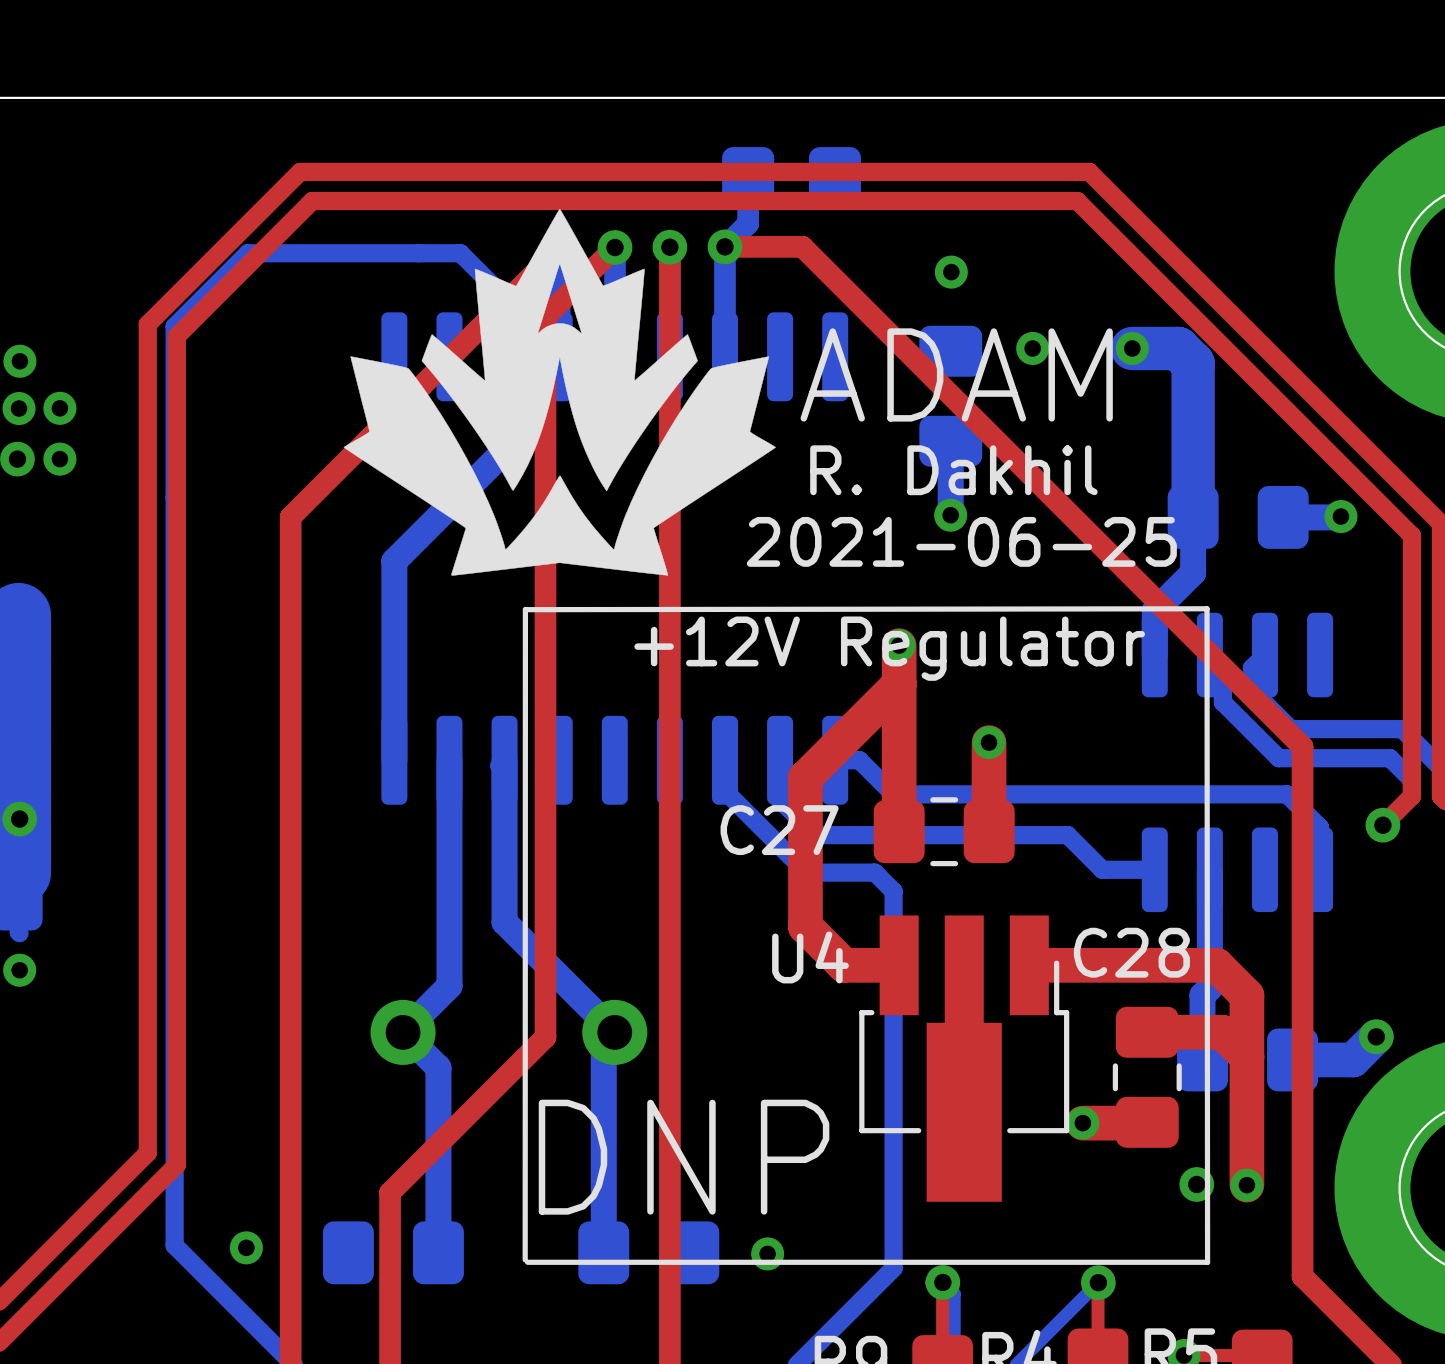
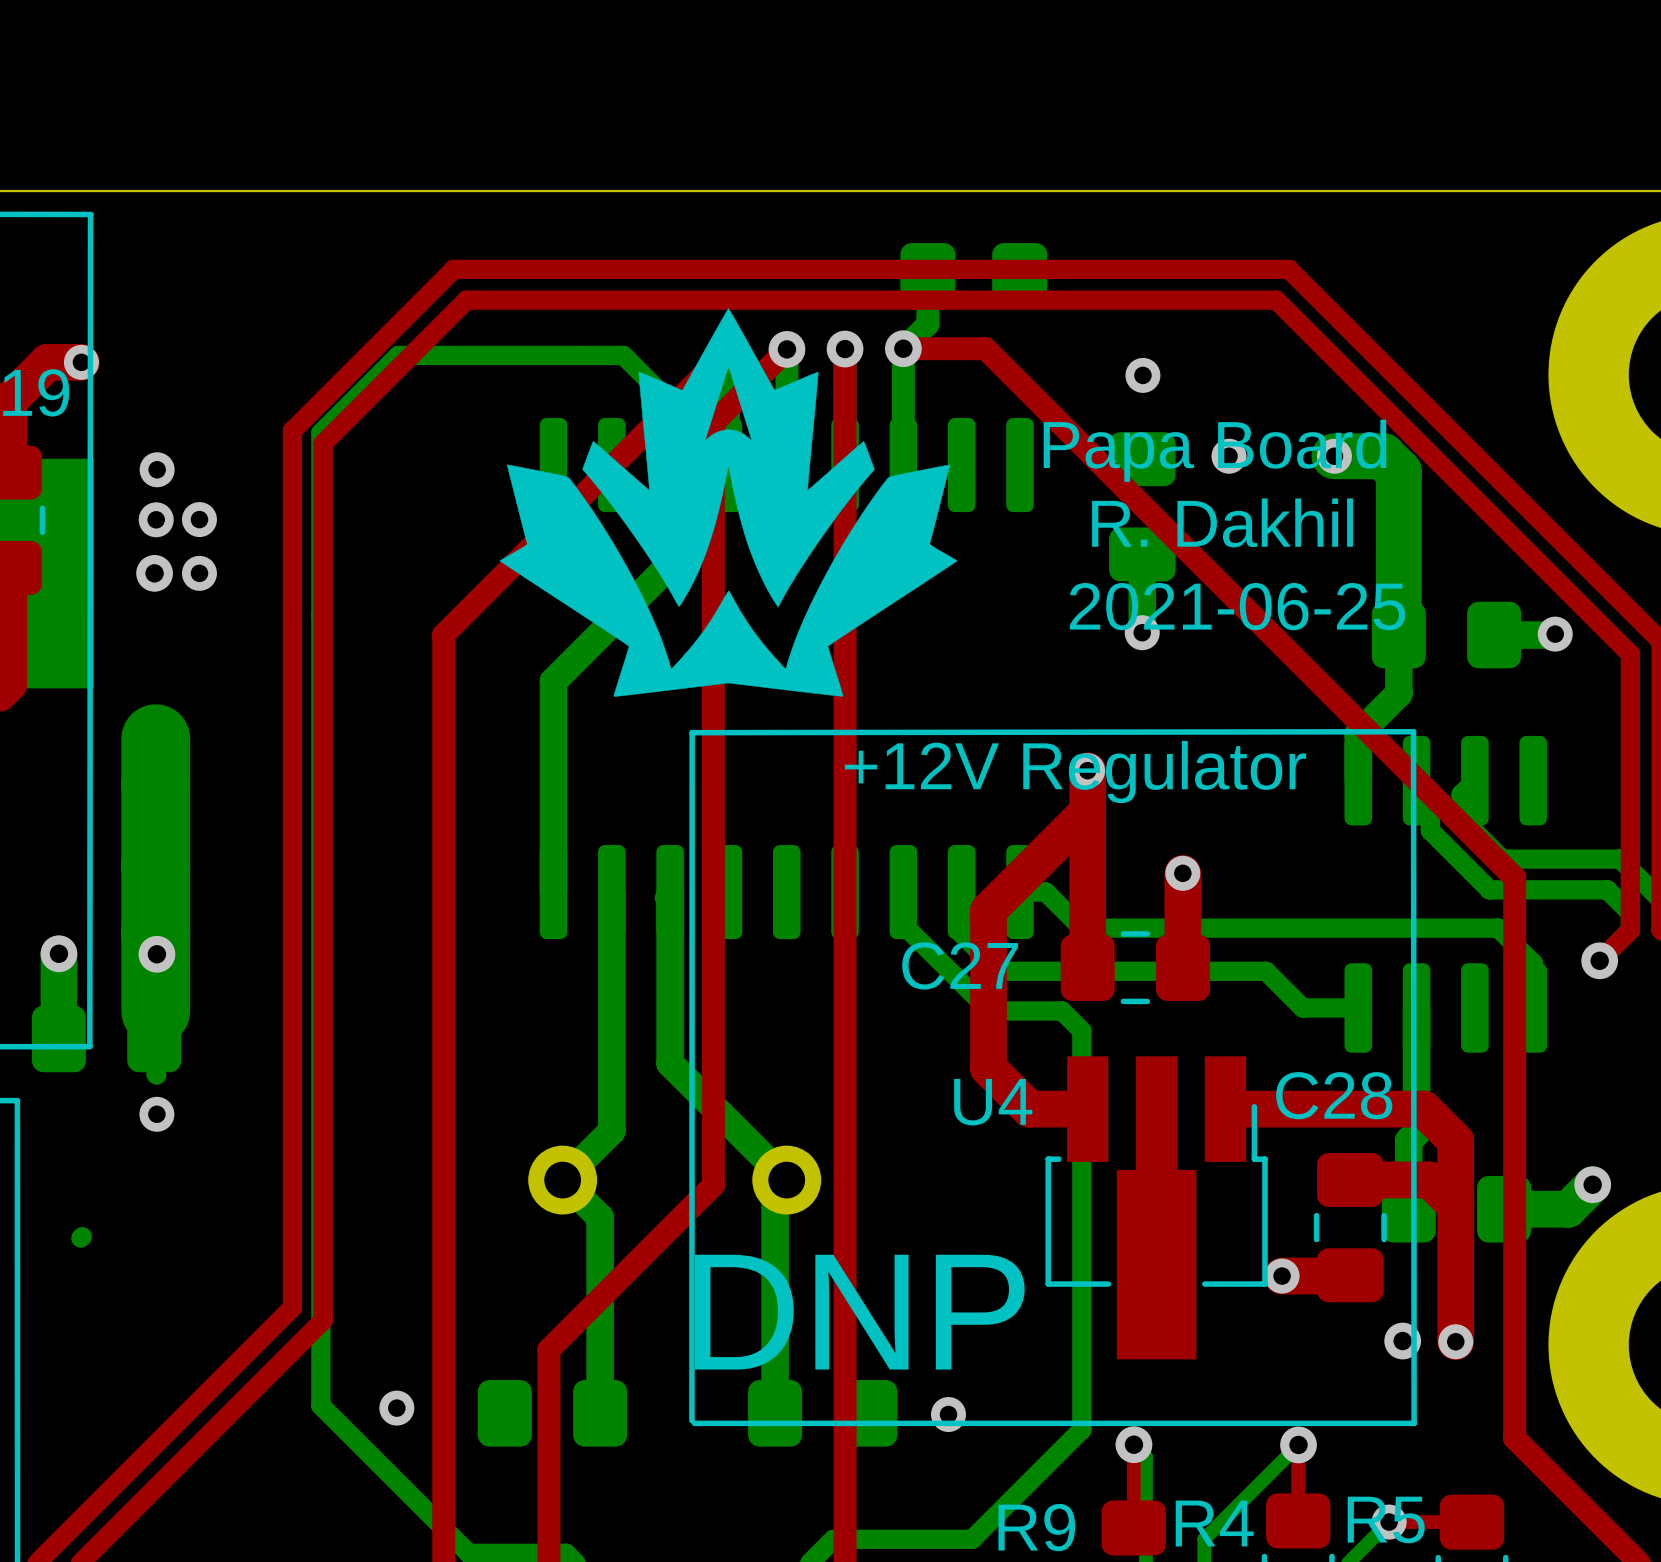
text: none -> Papa Board (1215, 450)
text: ADAM (956, 374) -> none
text position: R. Dakhil (953, 470) -> R. Dakhil (1222, 522)
text position: 2021-06-25 (961, 541) -> 2021-06-25 (1237, 606)

